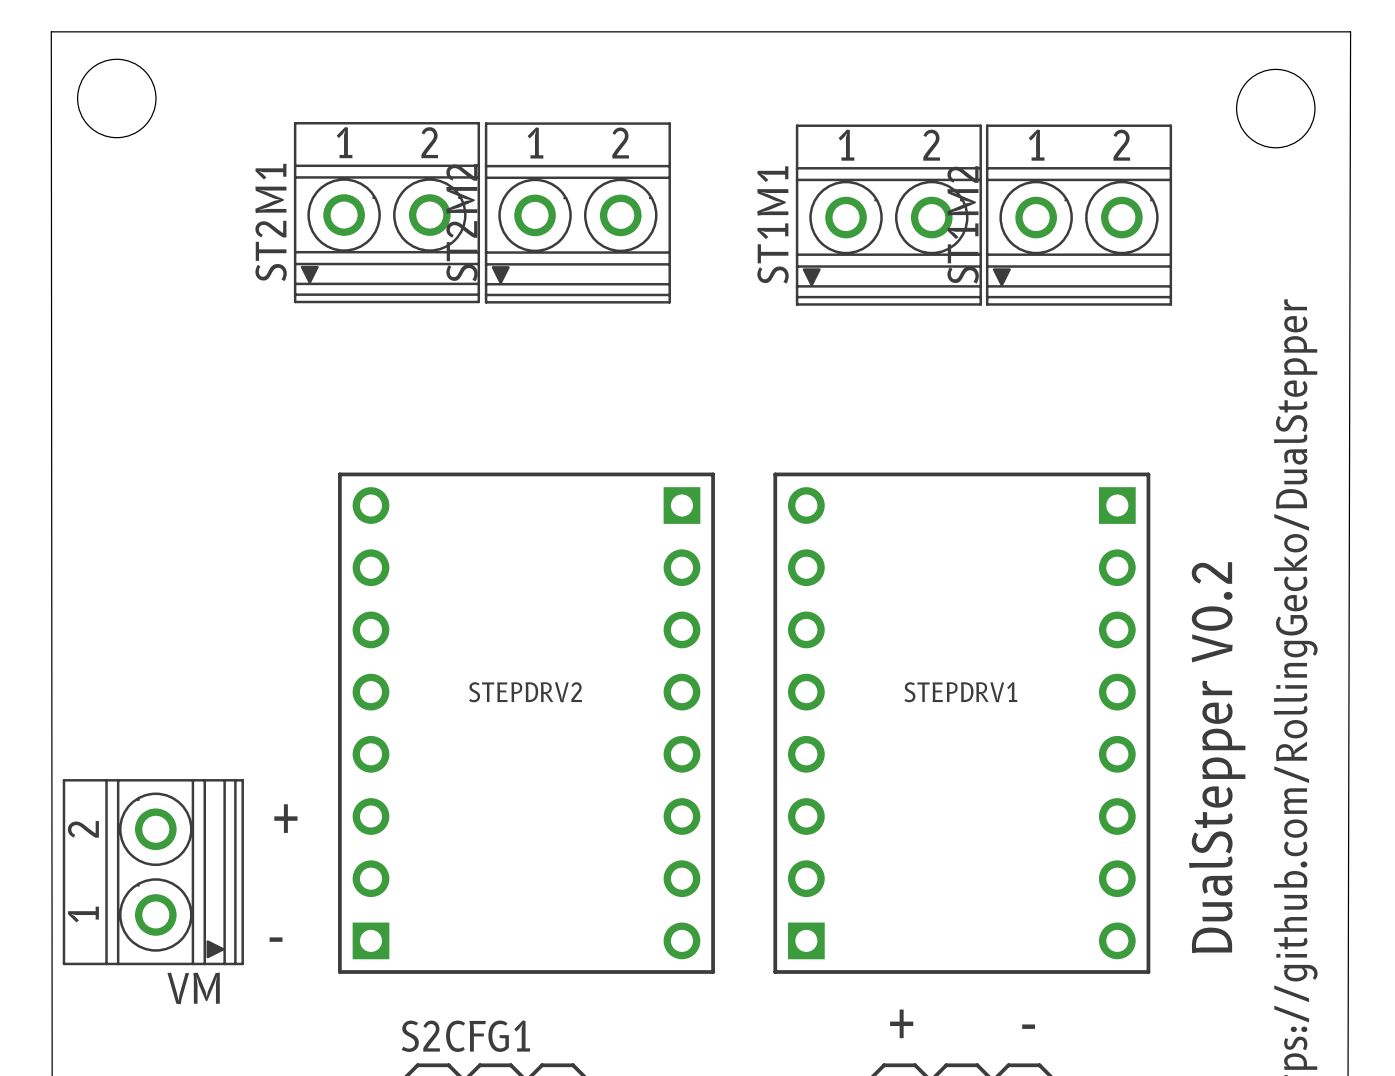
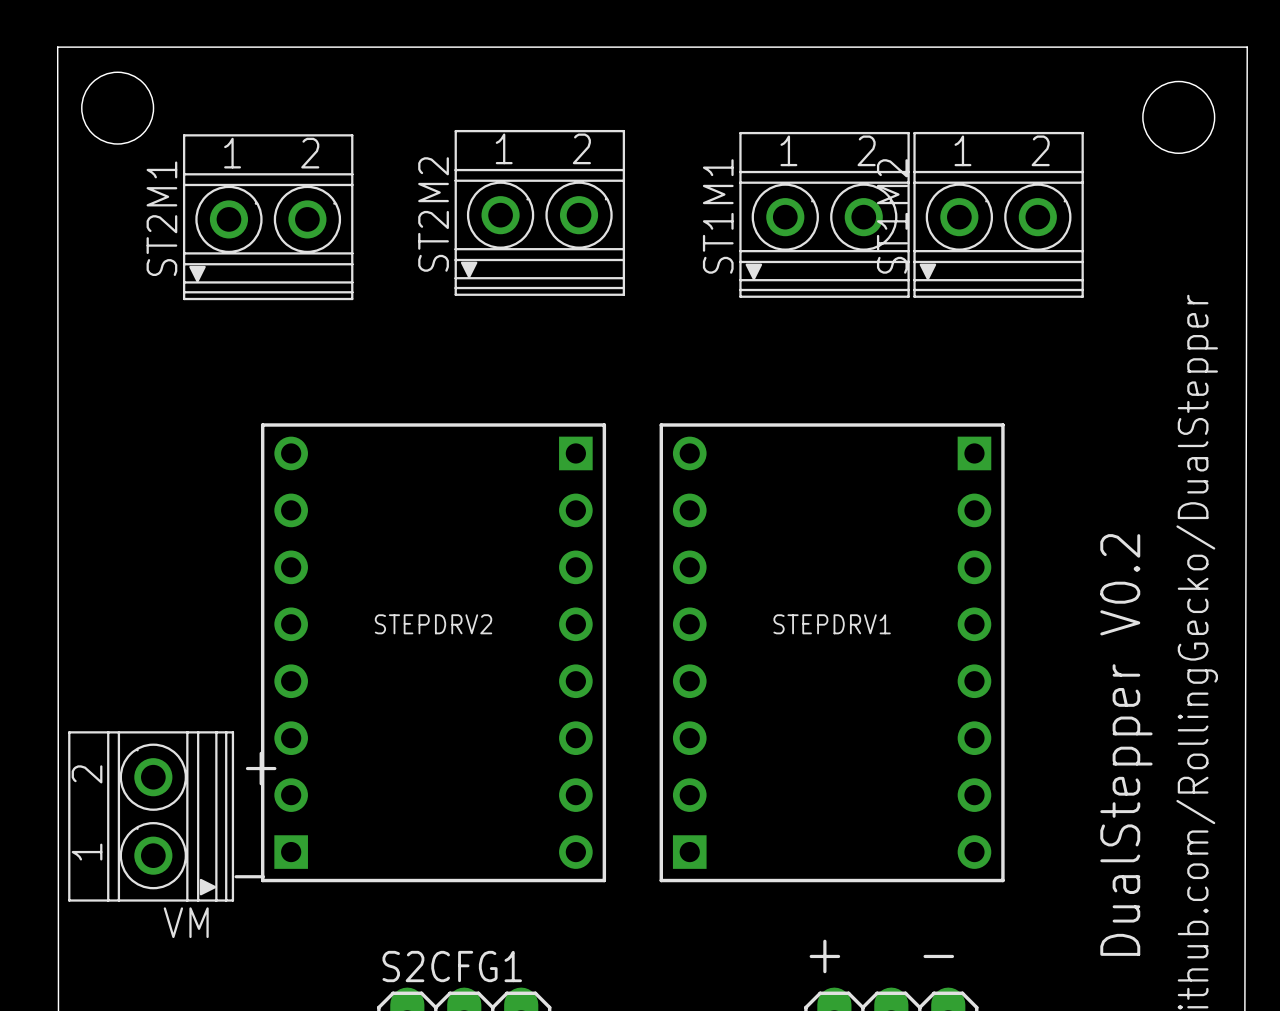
ST2M1 position: (386, 212) -> (268, 217)
STEPDRV2 position: (526, 723) -> (433, 652)
STEPDRV1 position: (961, 723) -> (832, 652)

